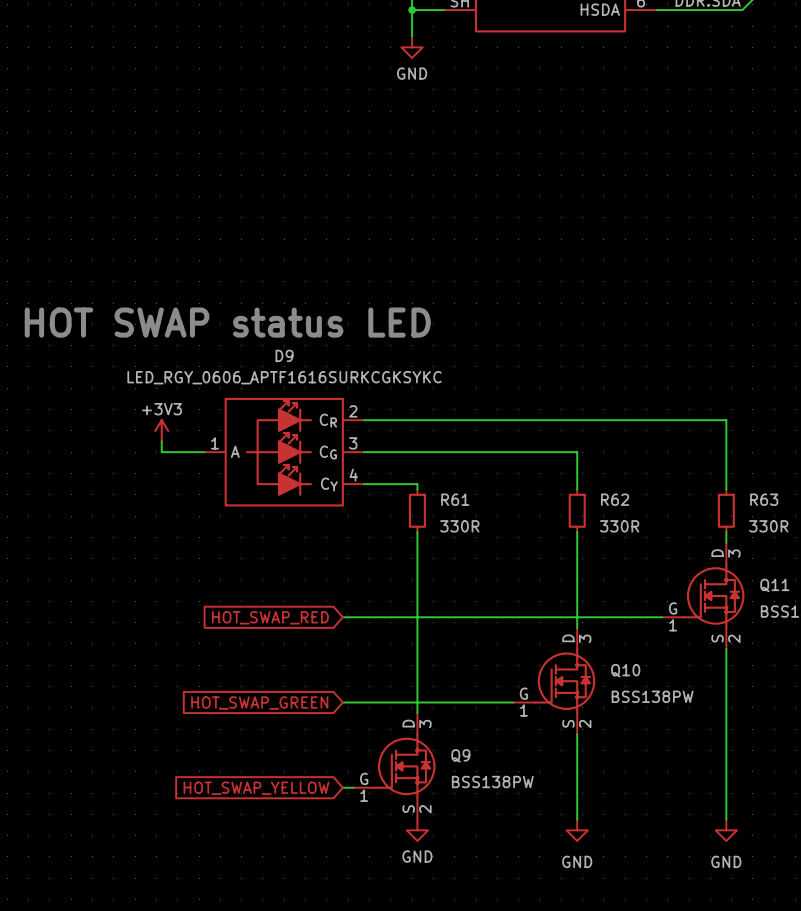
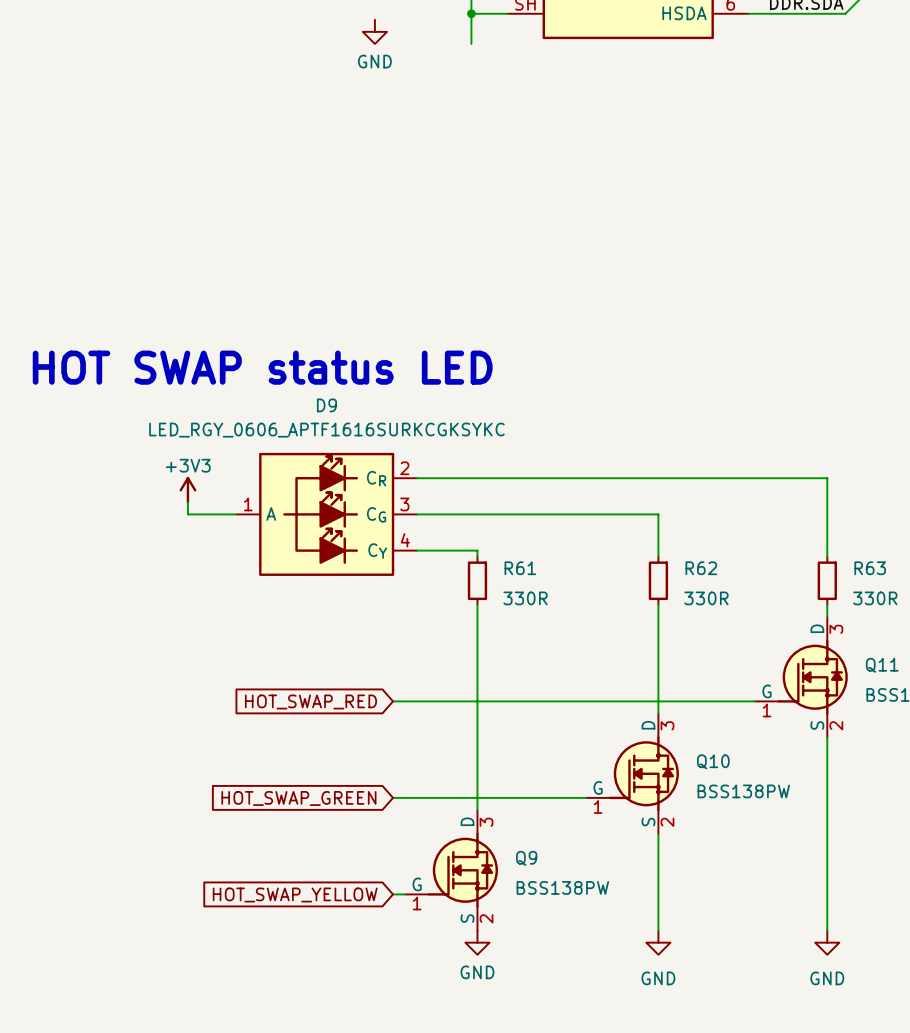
power symbol position: GND (412, 47) -> GND (374, 31)

